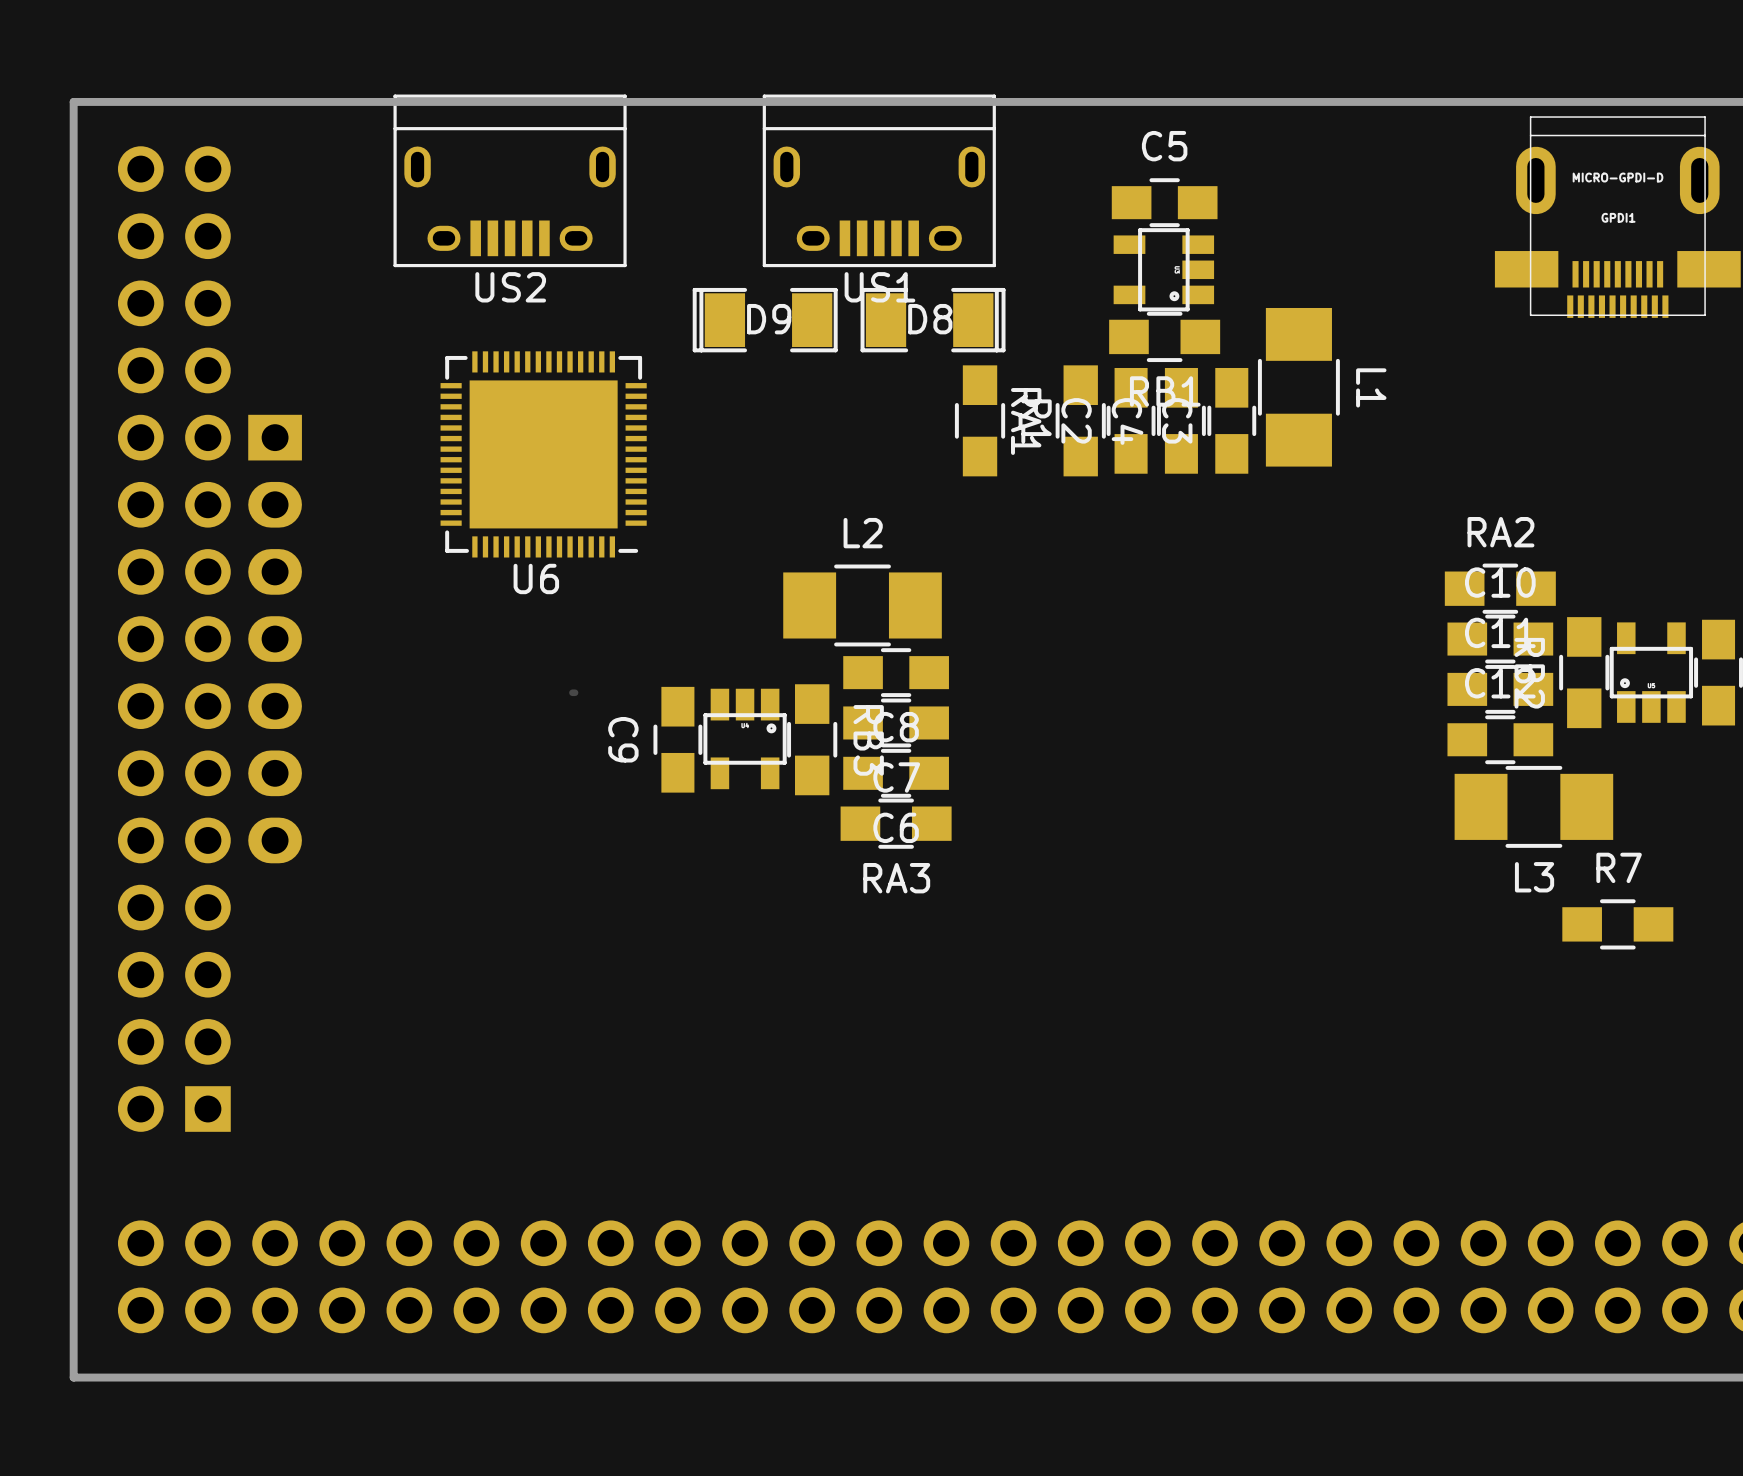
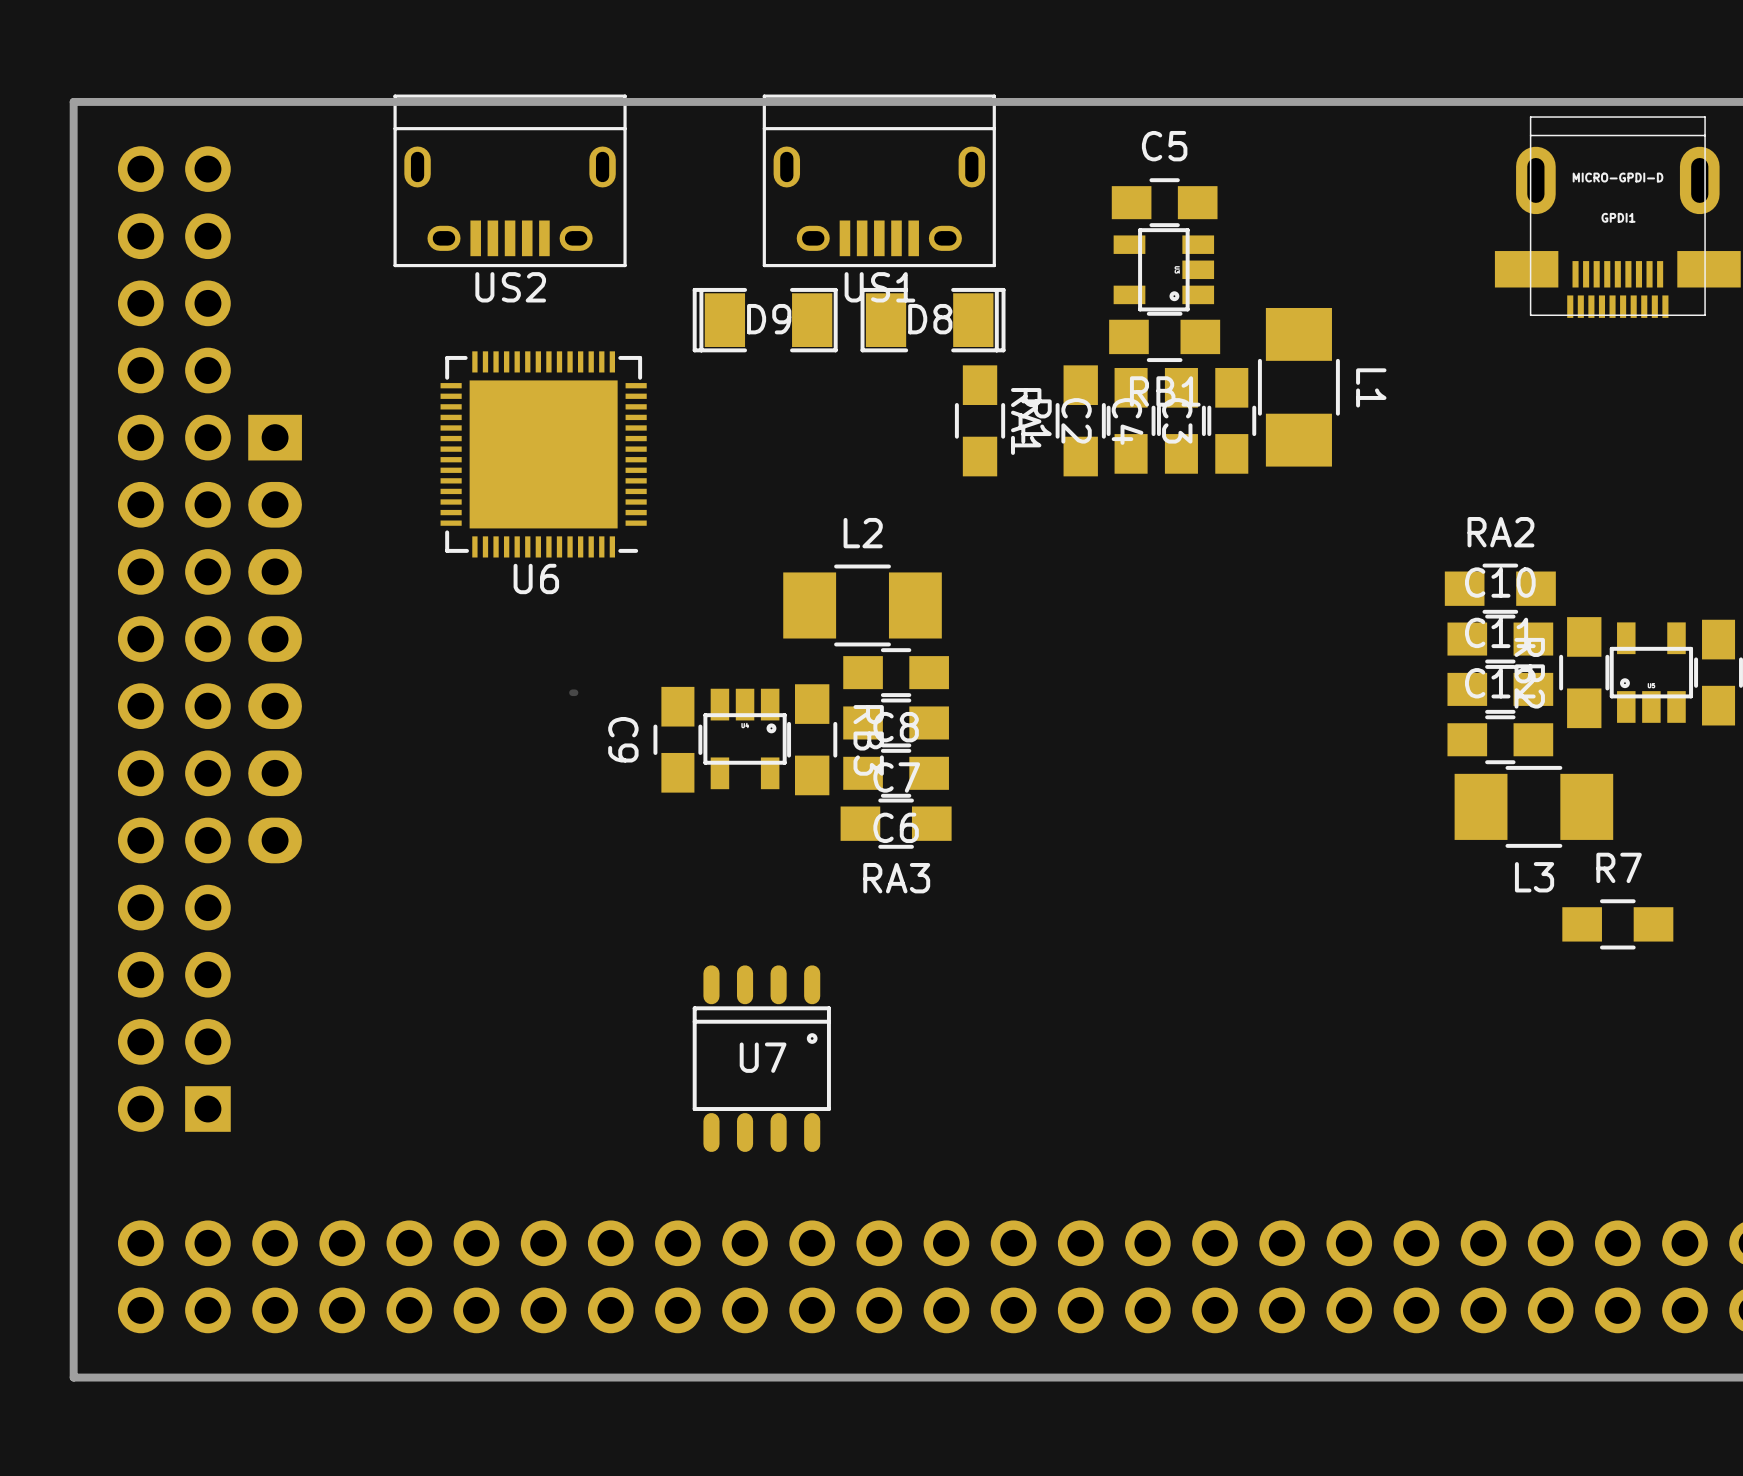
U7: none -> (761, 1058)

